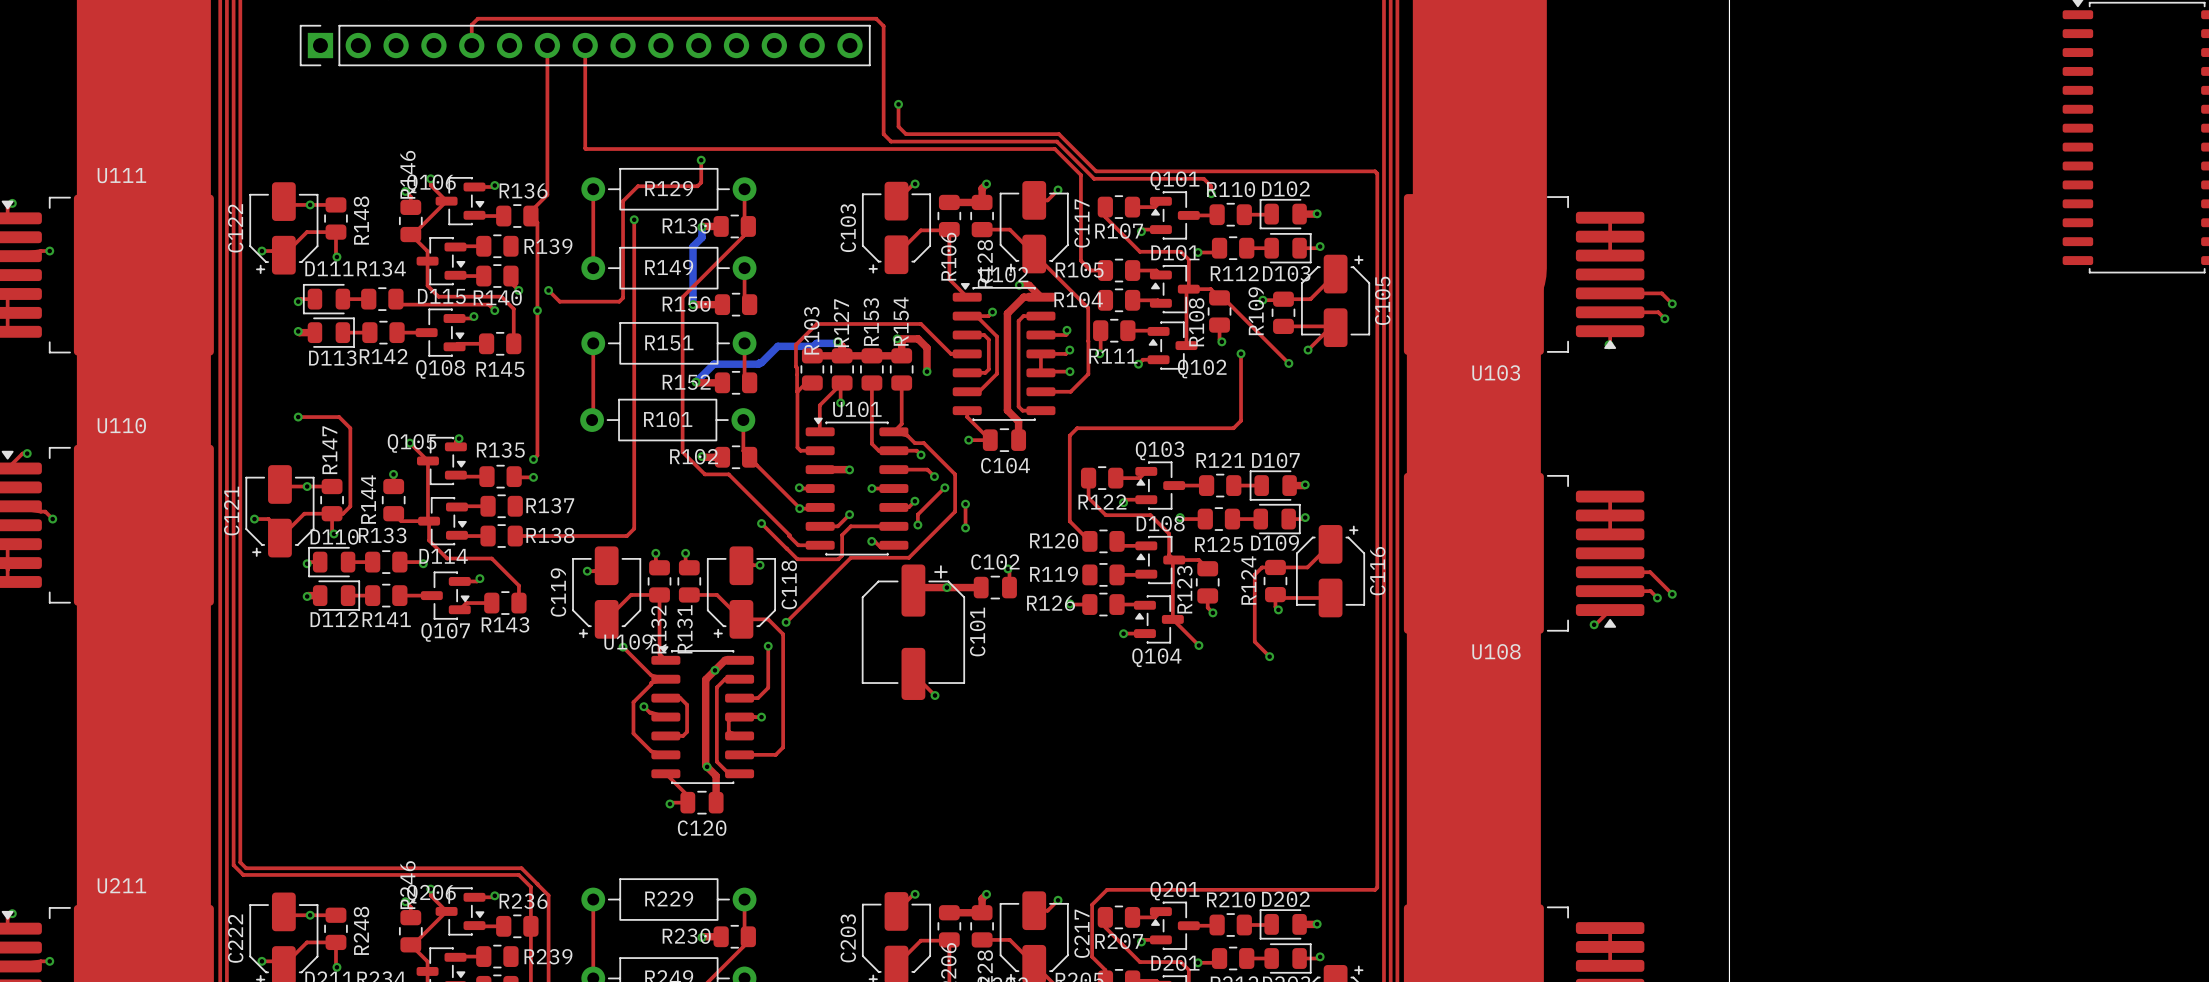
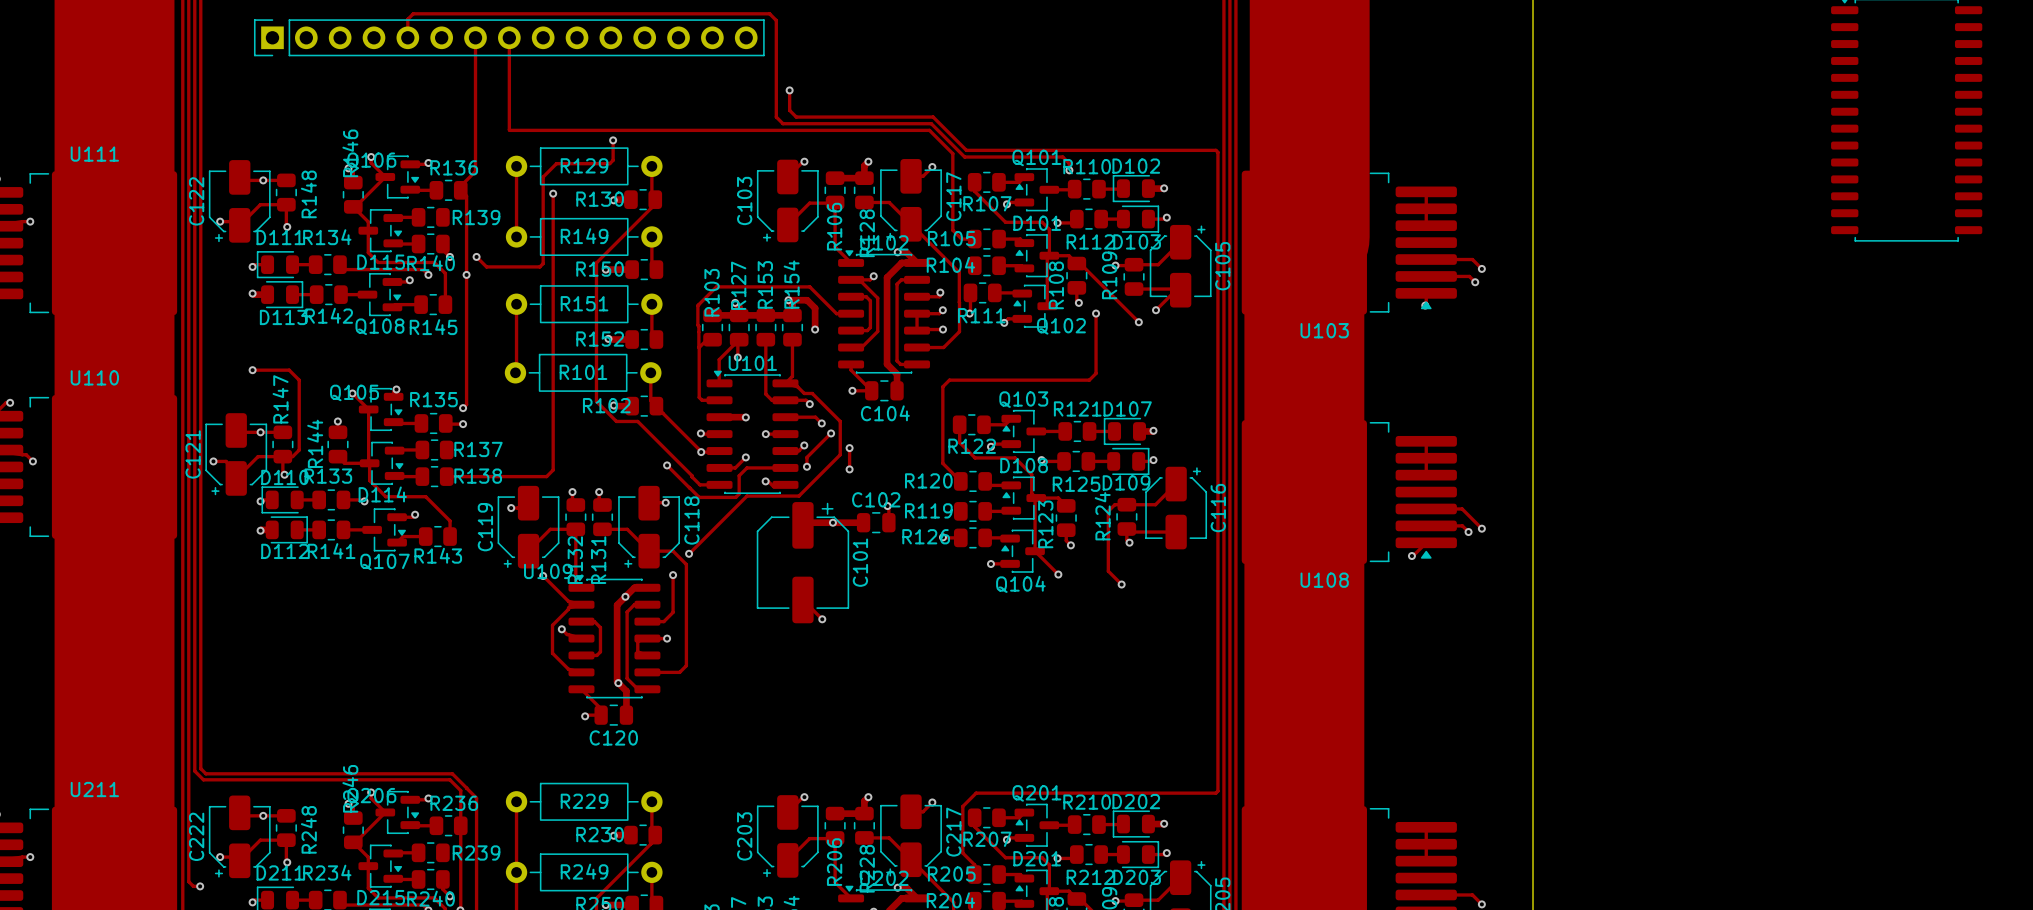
bottom track: (701, 227) (701, 237) (693, 246) (693, 304) -> none
bottom track: (837, 341) (816, 343) (813, 346) (777, 346) (758, 364) (713, 364) (696, 382) -> none

